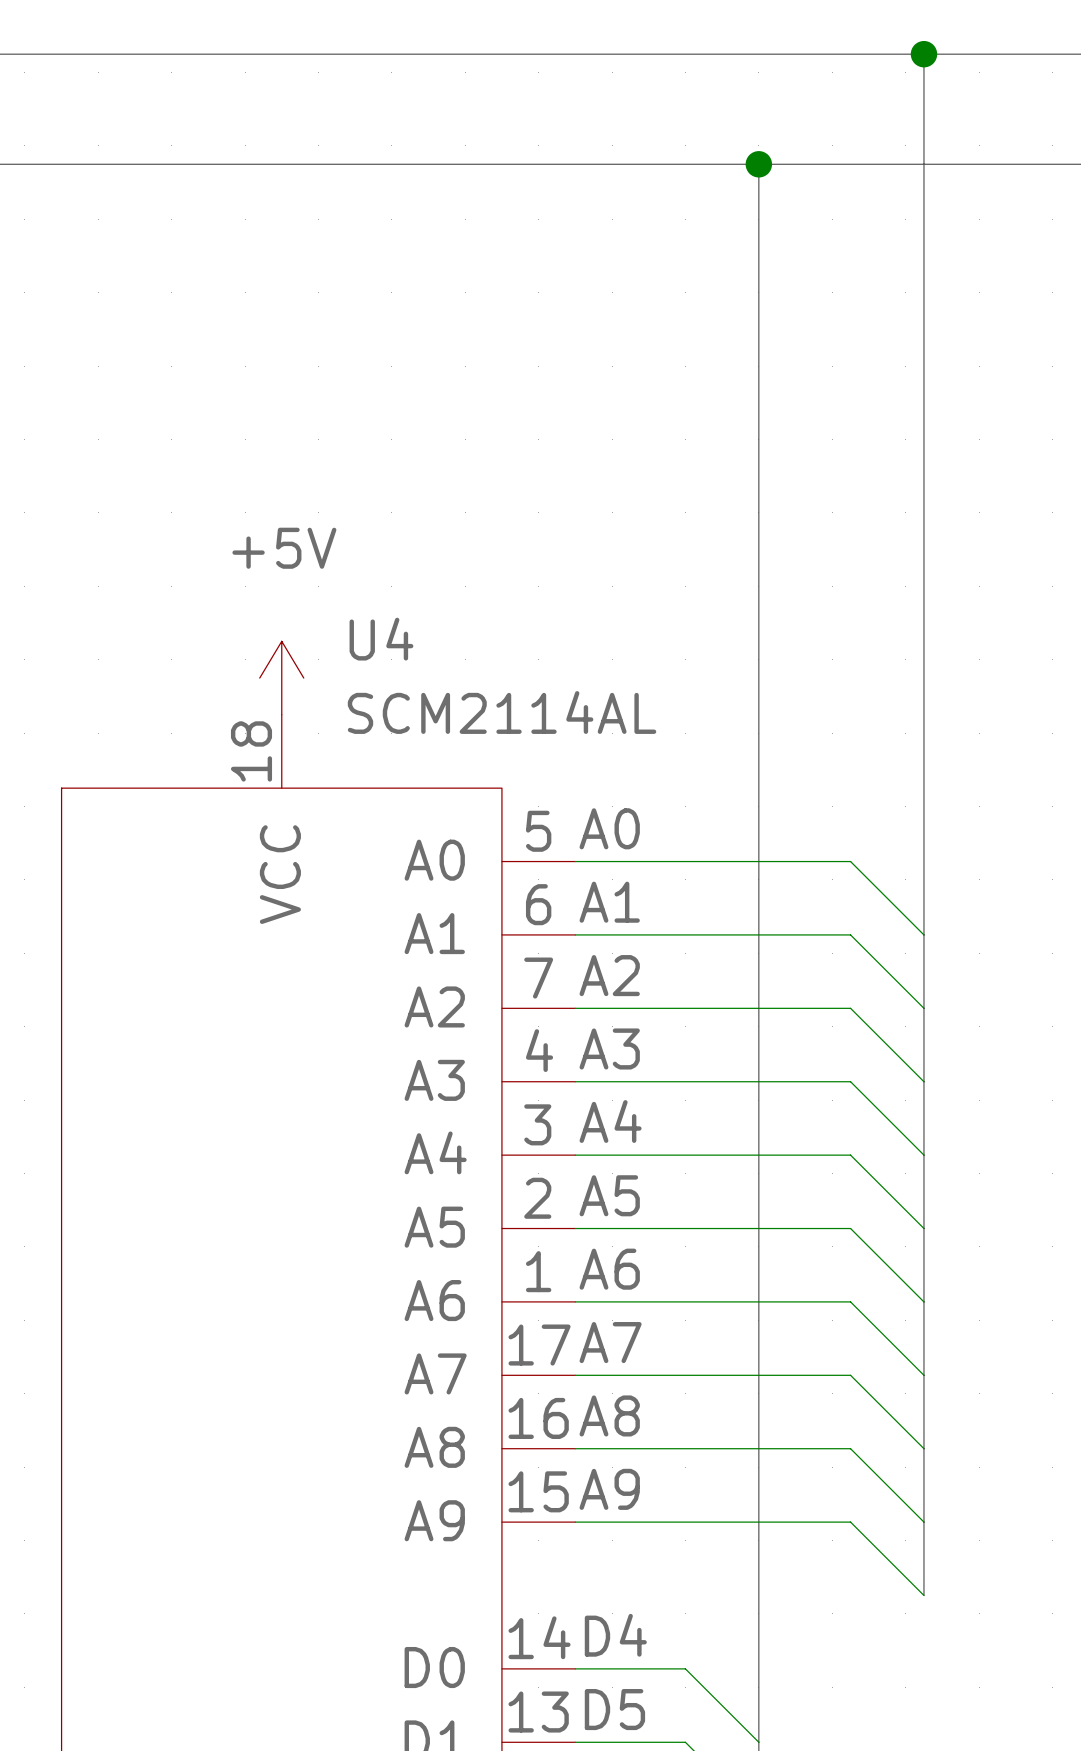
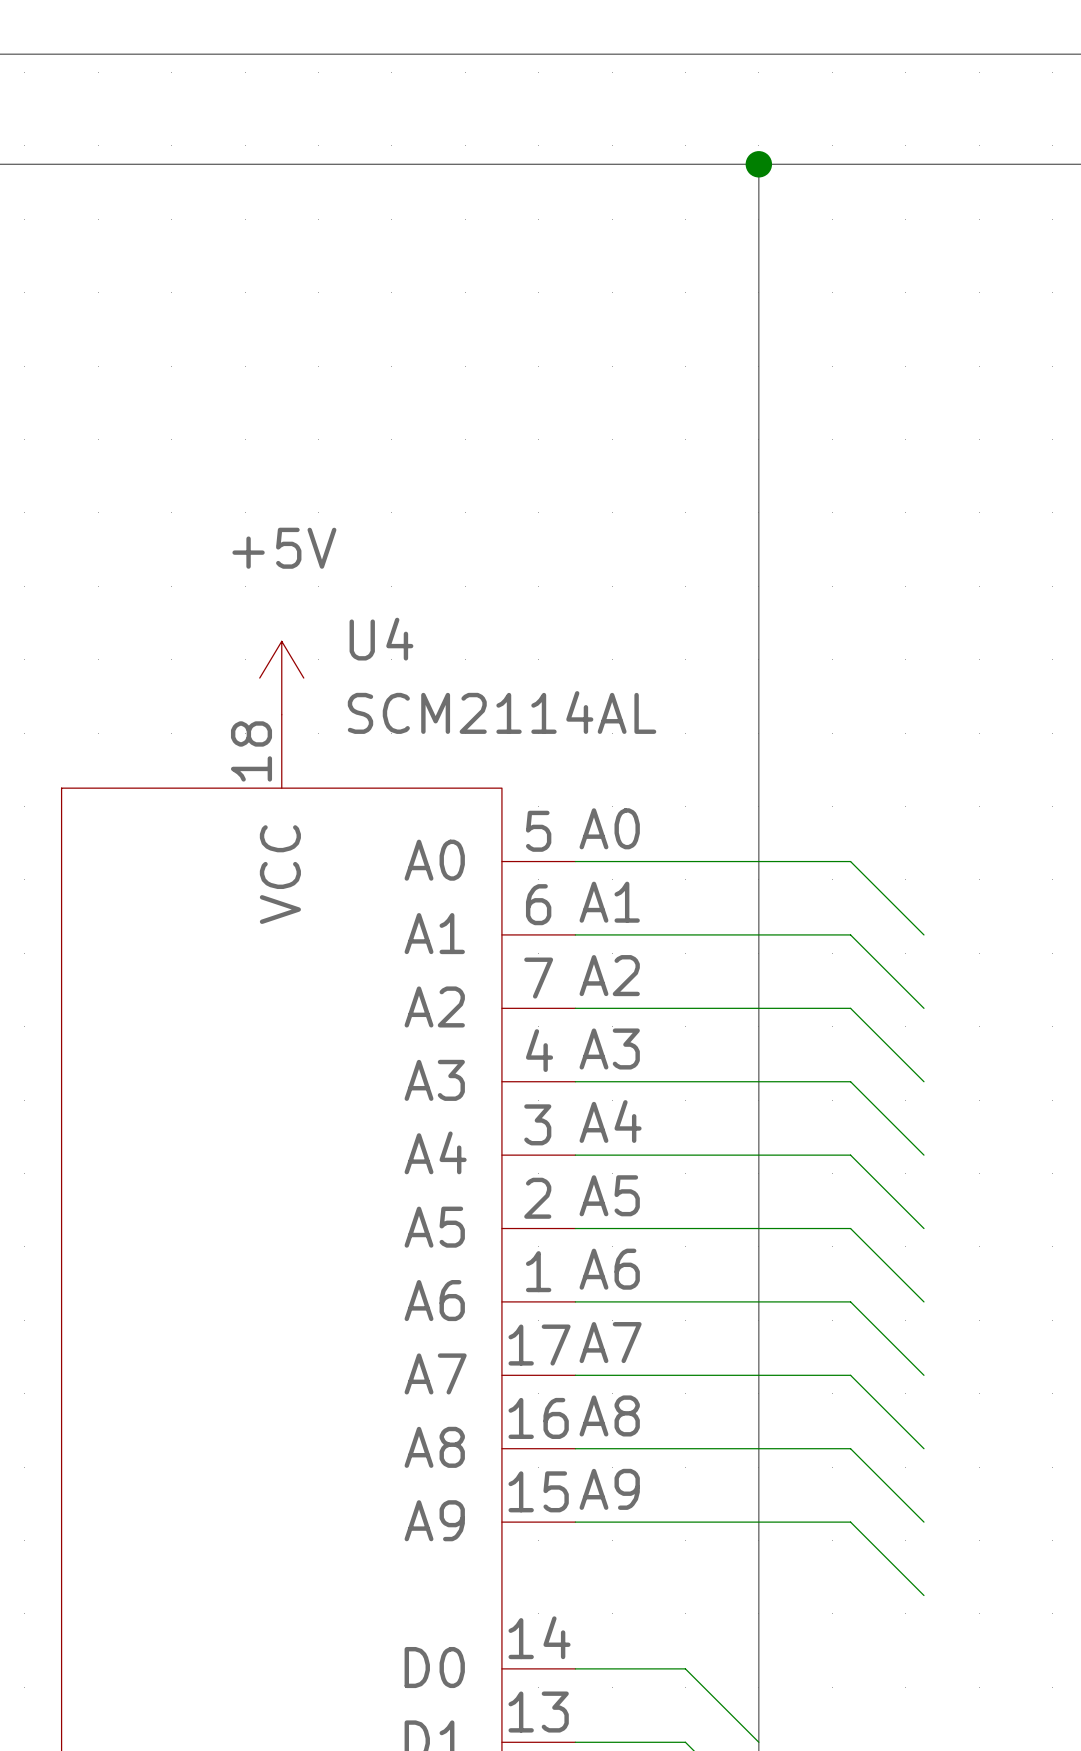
bus: (923, 54) (923, 1595) -> none
junction: (923, 54) -> none
label: D4 (615, 1635) -> none
label: D5 (614, 1709) -> none

